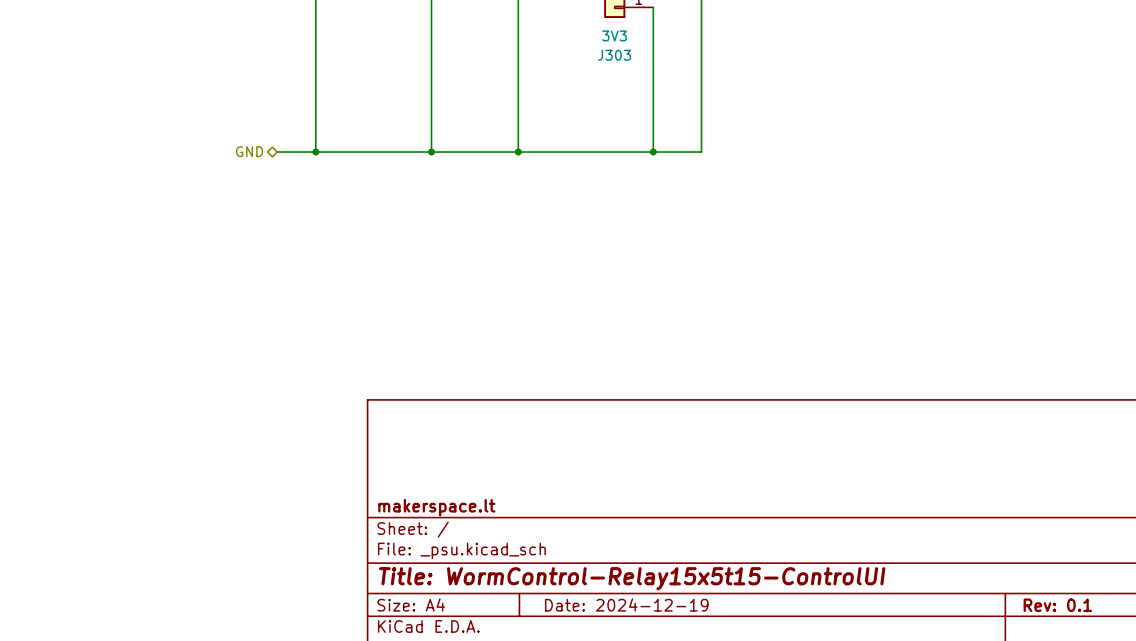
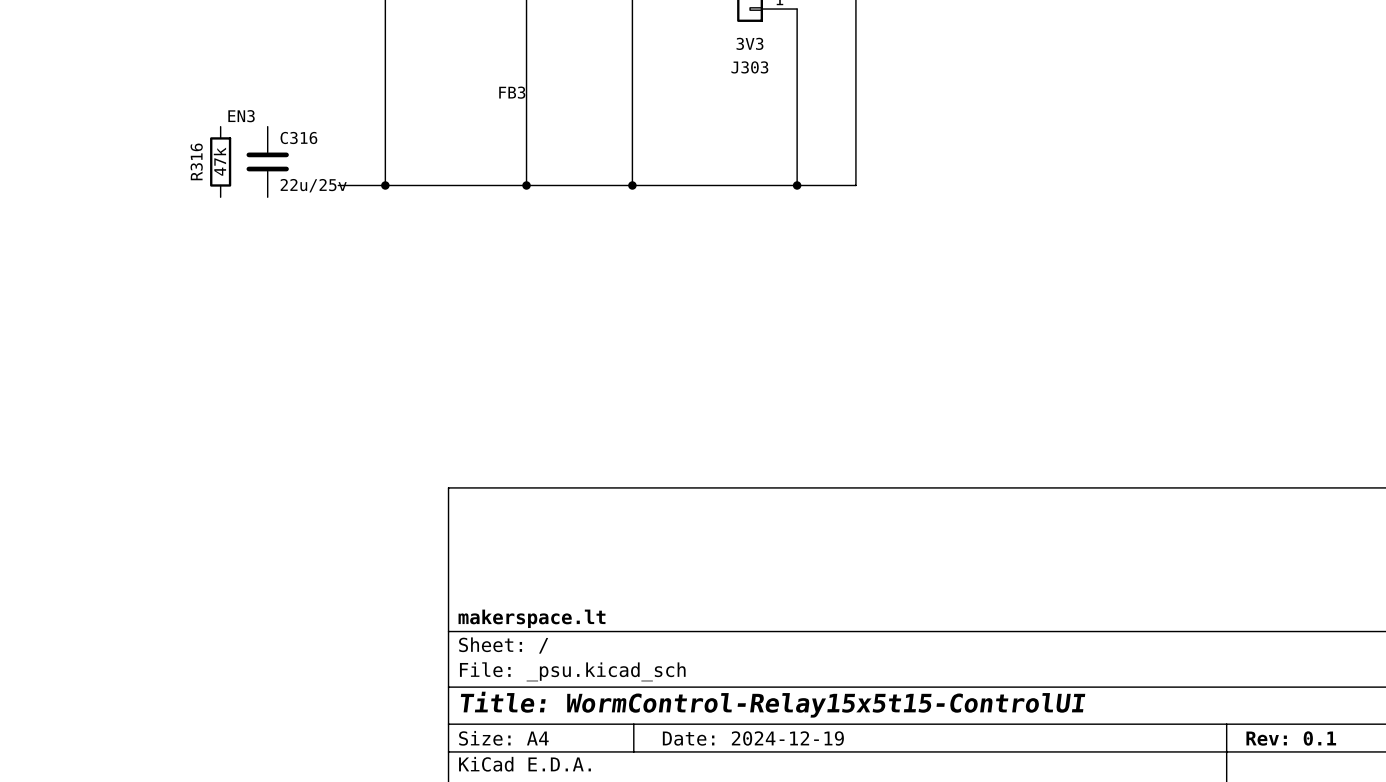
label: none -> FB3 (512, 92)
label: none -> EN3 (241, 116)
R316: none -> 47k (220, 161)
C316: none -> 22u/25v (267, 161)
hierarchical label: GND (249, 151) -> none

